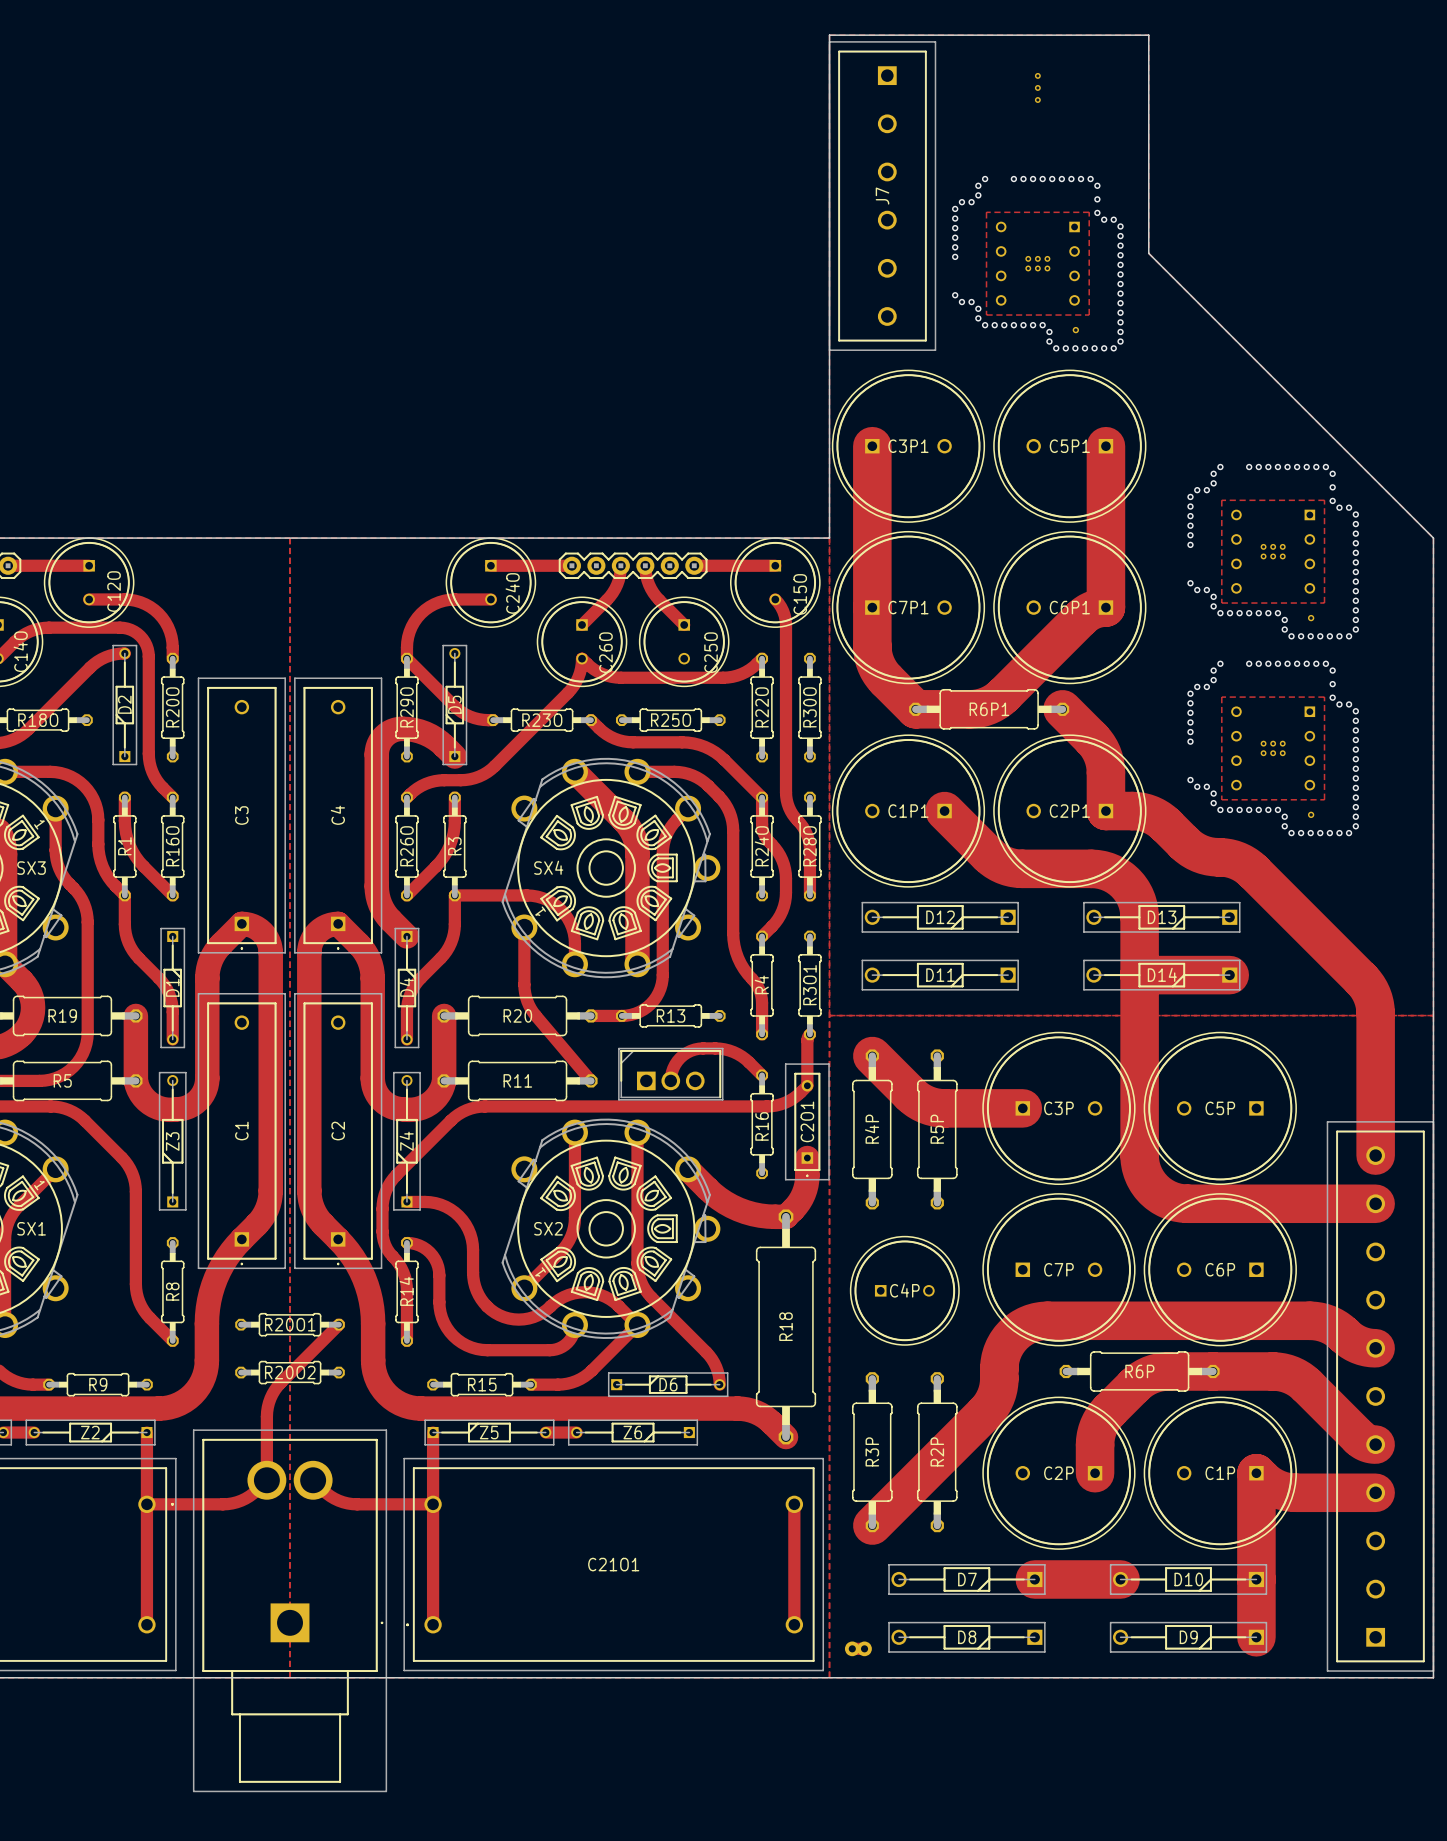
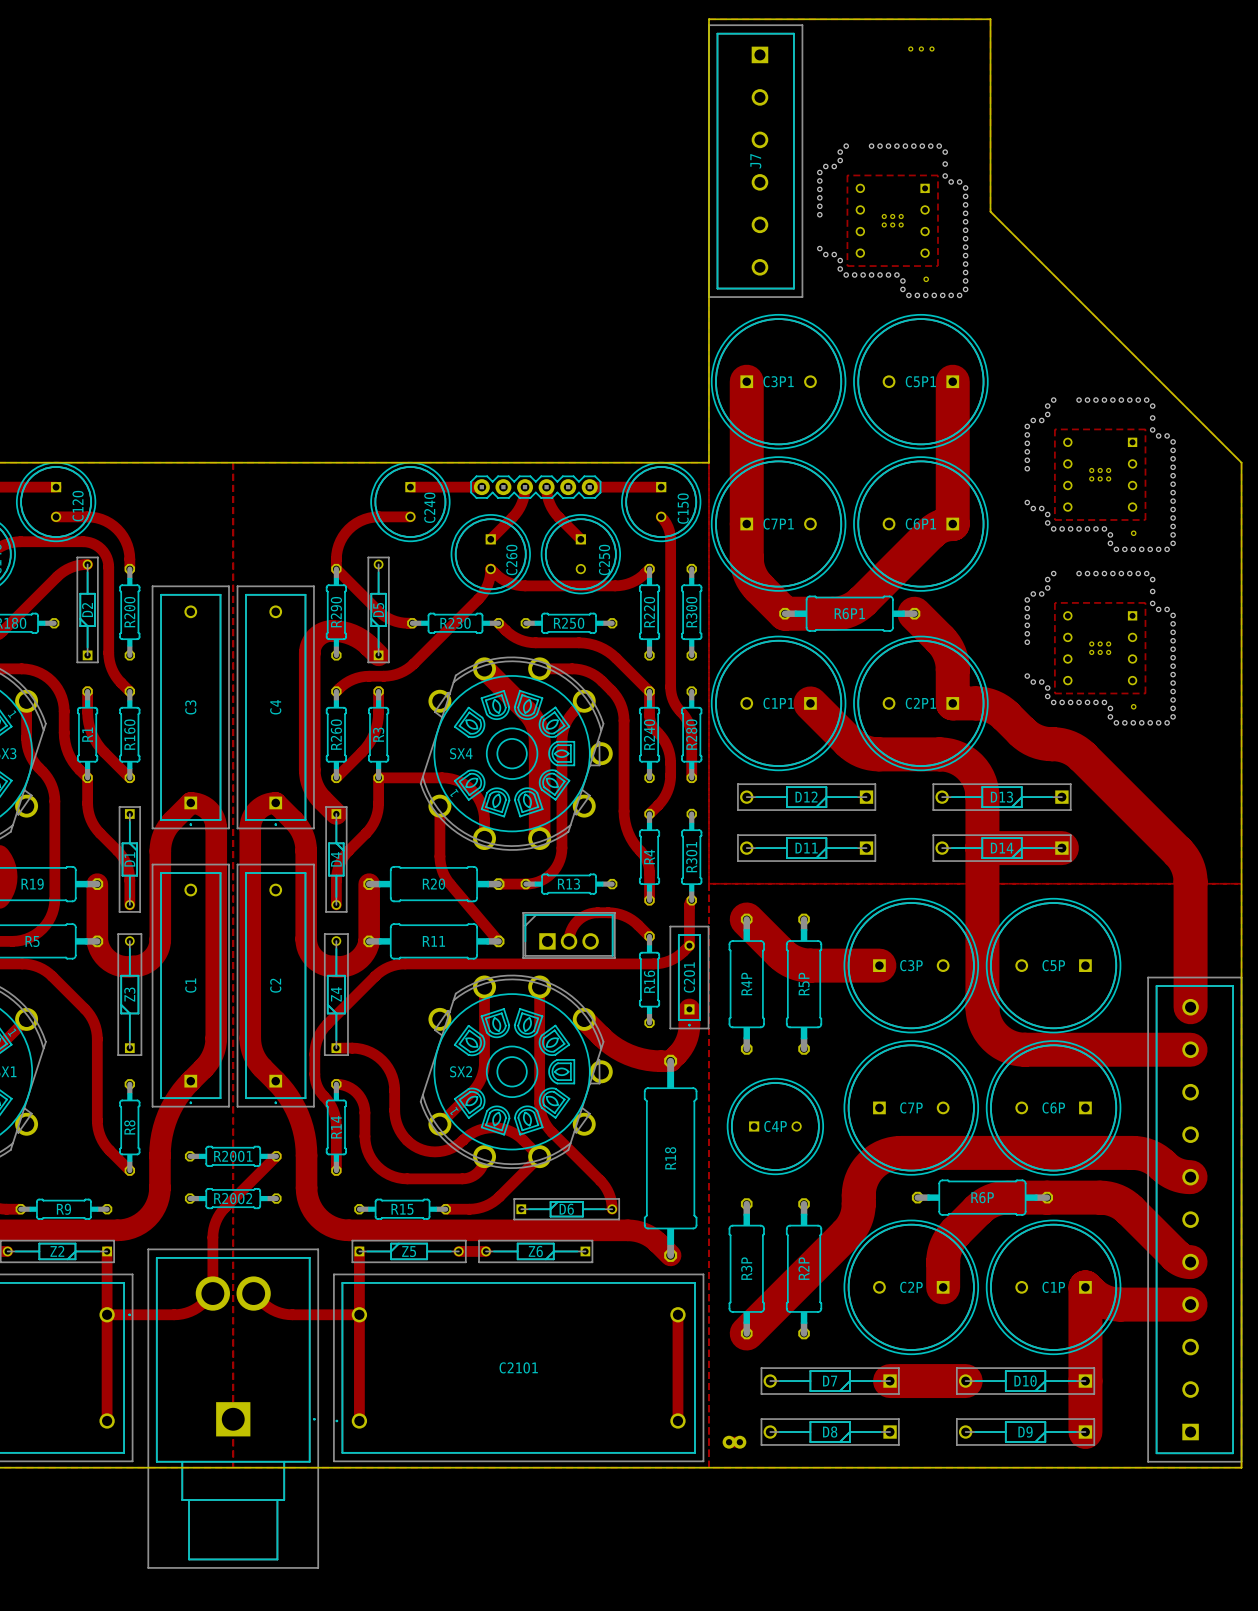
part rotation: 0° (1037, 87) -> 90° clockwise (921, 48)
part position: (1037, 87) -> (921, 48)

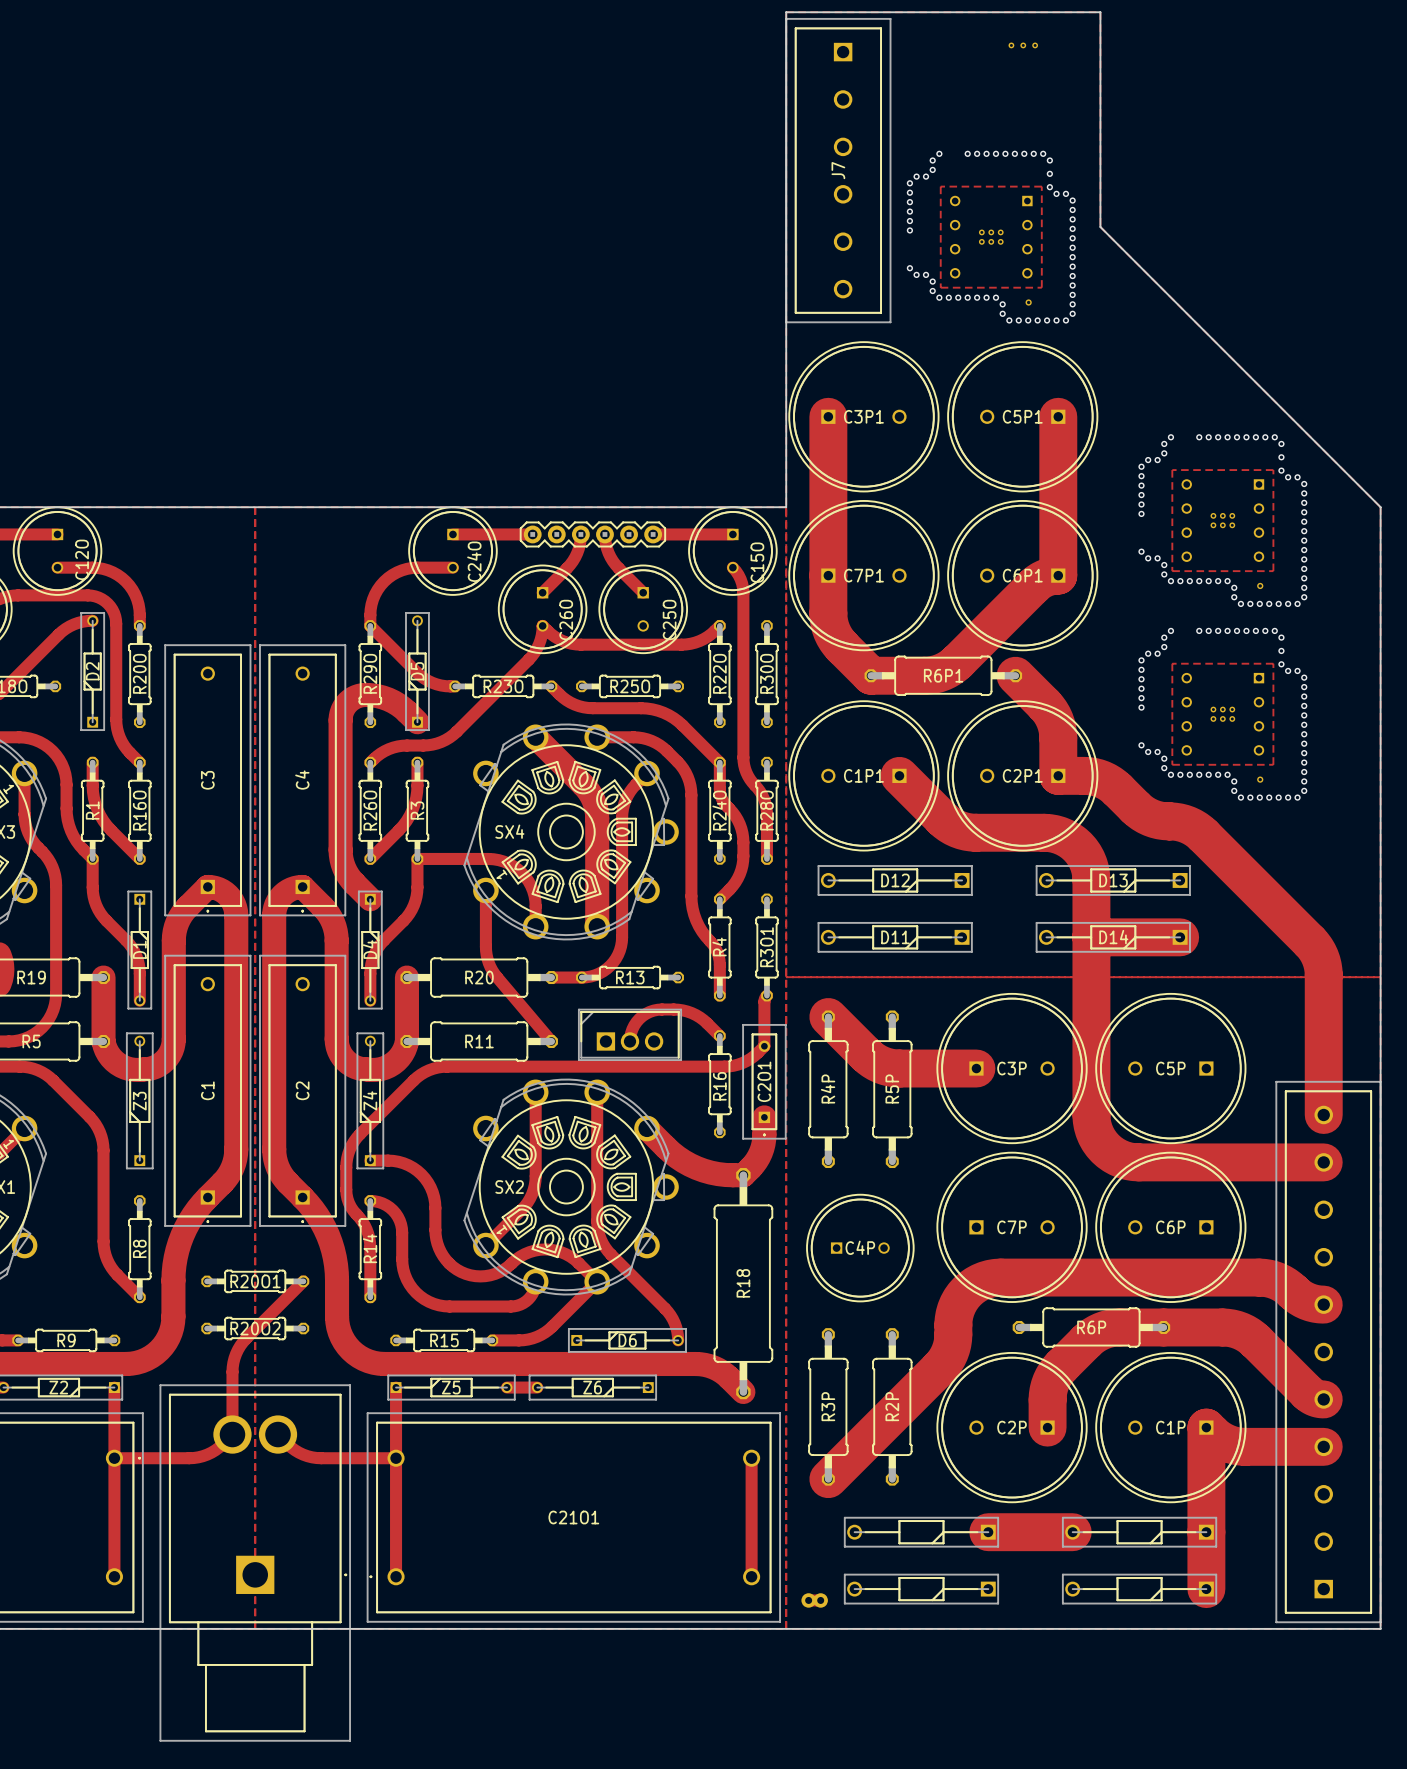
D7 name: D7 (830, 1381) -> none
D10 name: D10 (1025, 1381) -> none
D8 name: D8 (830, 1432) -> none
D9 name: D9 (1025, 1432) -> none

